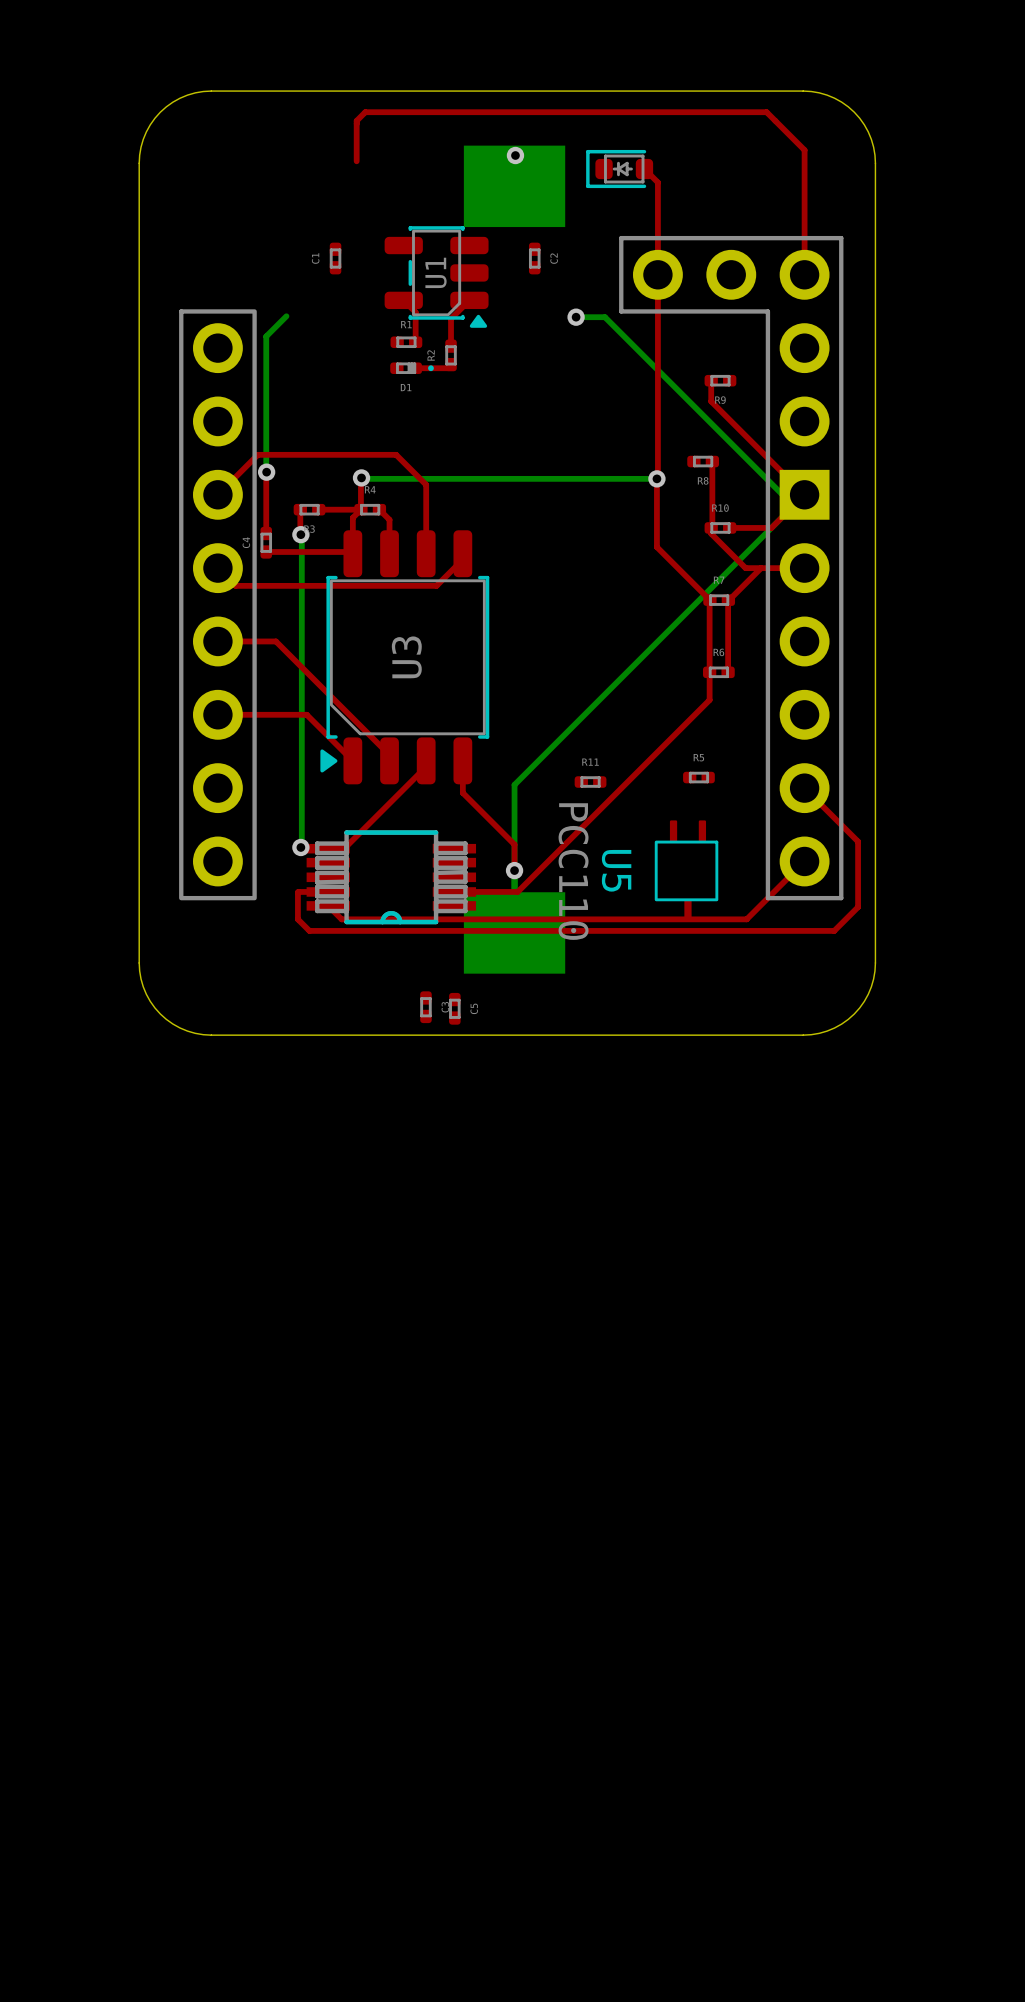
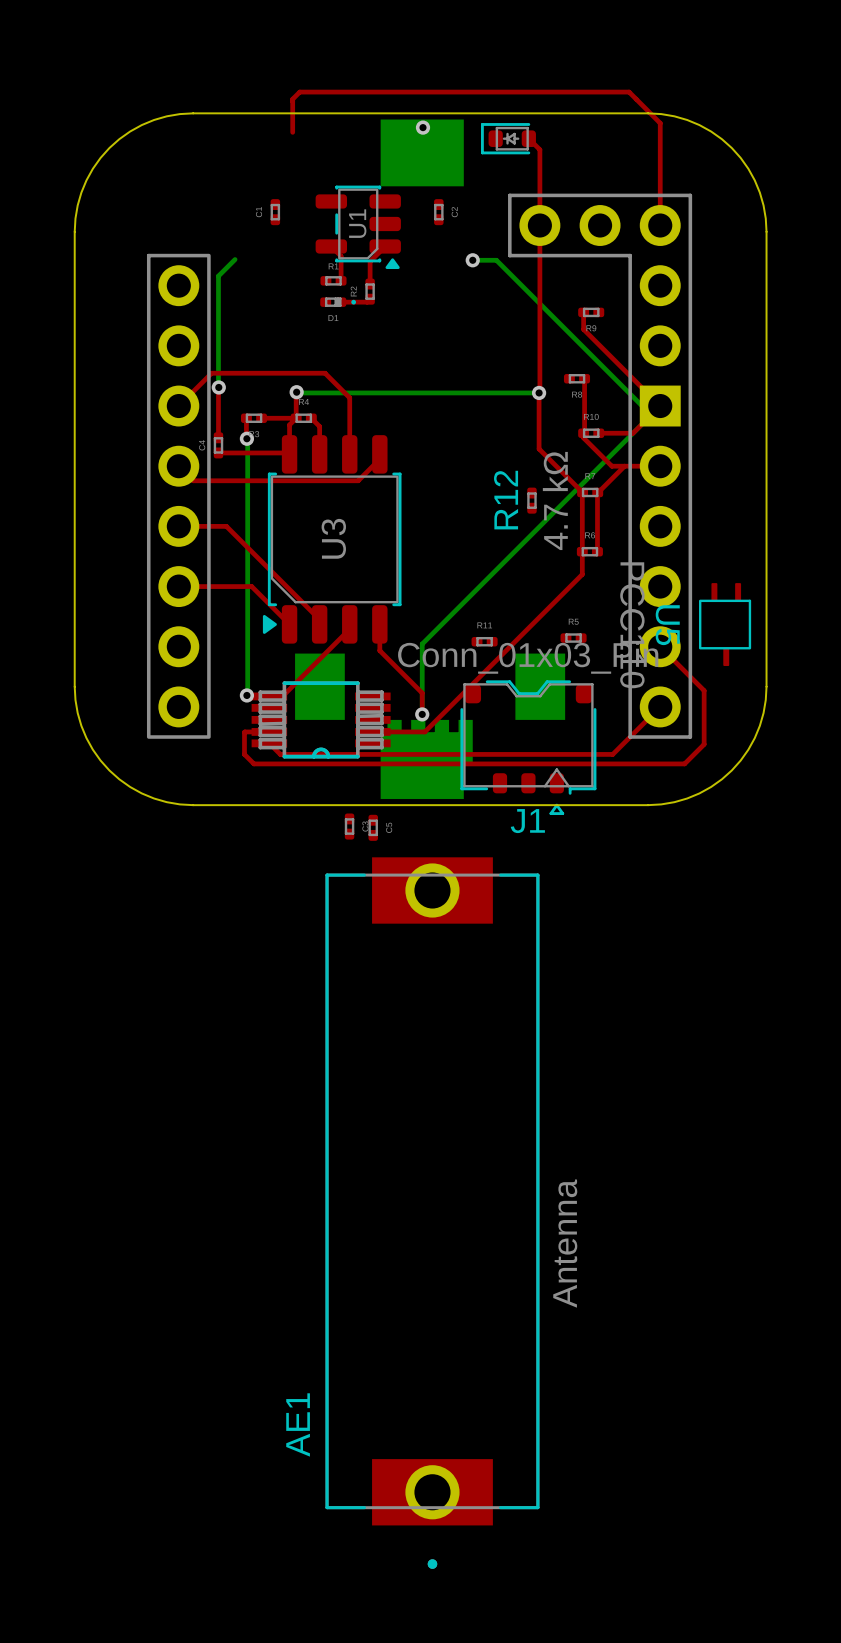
board edge: (211, 91) (803, 91) (819, 92) (834, 98) (848, 106) (864, 124) (871, 139) (875, 163) (875, 962) (871, 986) (864, 1001) (854, 1014) (841, 1024) (819, 1033) (803, 1035) (211, 1035) (195, 1033) (172, 1024) (160, 1014) (150, 1001) (141, 979) (139, 962) (139, 155) (146, 131) (160, 112) (180, 98) (195, 92) (211, 91) -> (193, 113) (166, 116) (141, 125) (109, 148) (86, 180) (75, 218) (74, 686) (81, 725) (100, 760) (119, 779) (141, 793) (166, 802) (193, 805) (648, 805) (687, 798) (721, 779) (740, 760) (754, 738) (763, 713) (766, 686) (766, 231) (759, 192) (740, 157) (711, 131) (687, 119) (661, 114) (193, 113)
R12: none -> 4.7 kΩ (531, 500)
part: none -> (430, 709)
U5 position: (686, 870) -> (725, 624)
J1: none -> Conn_01x03_Pin (528, 747)
AE1: none -> Antenna (432, 1213)

